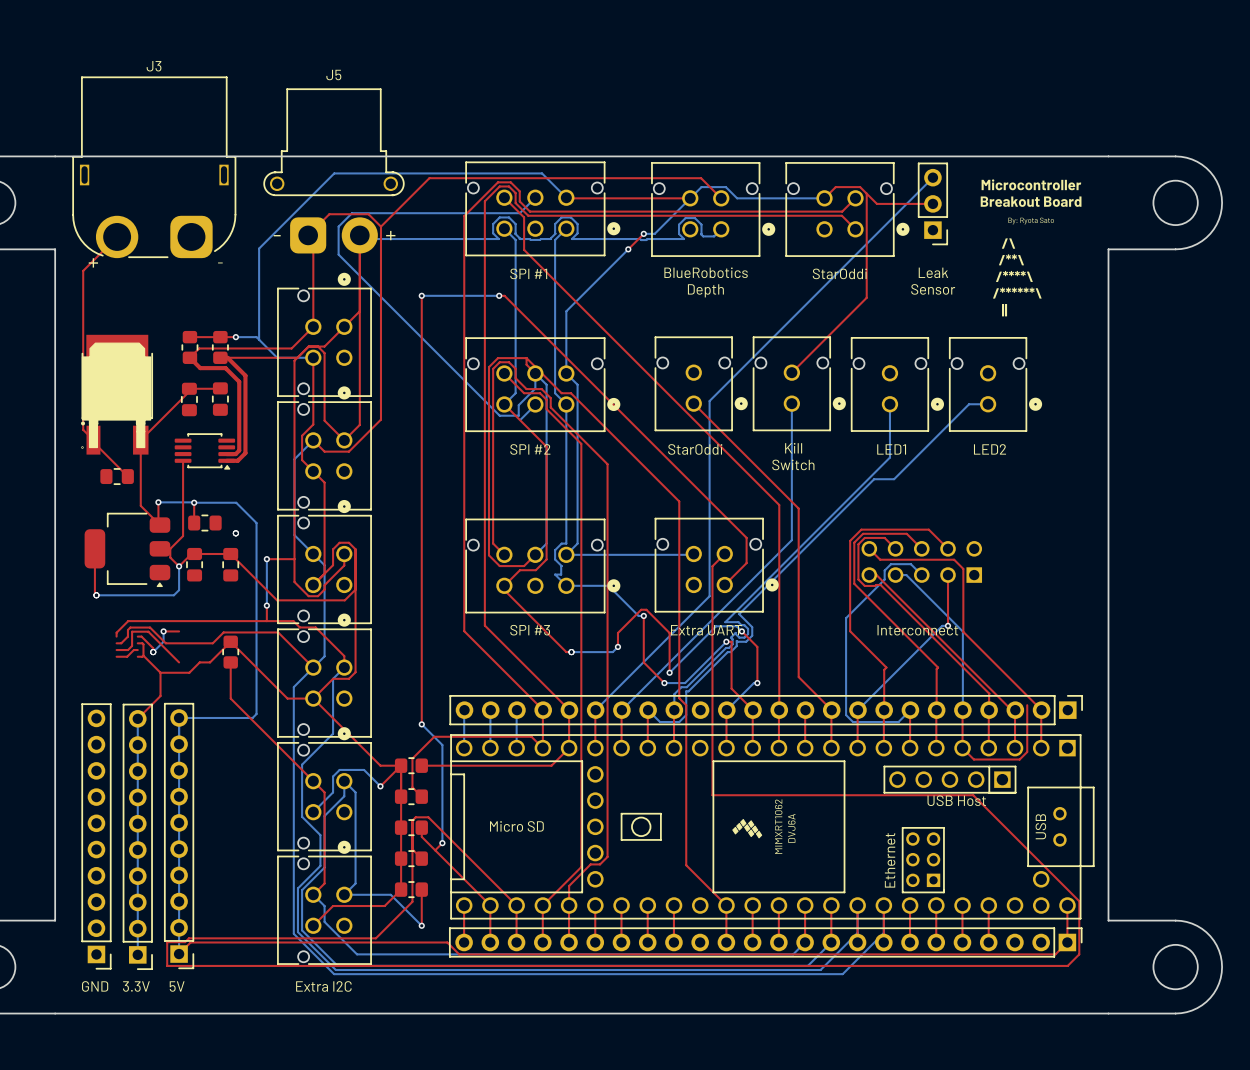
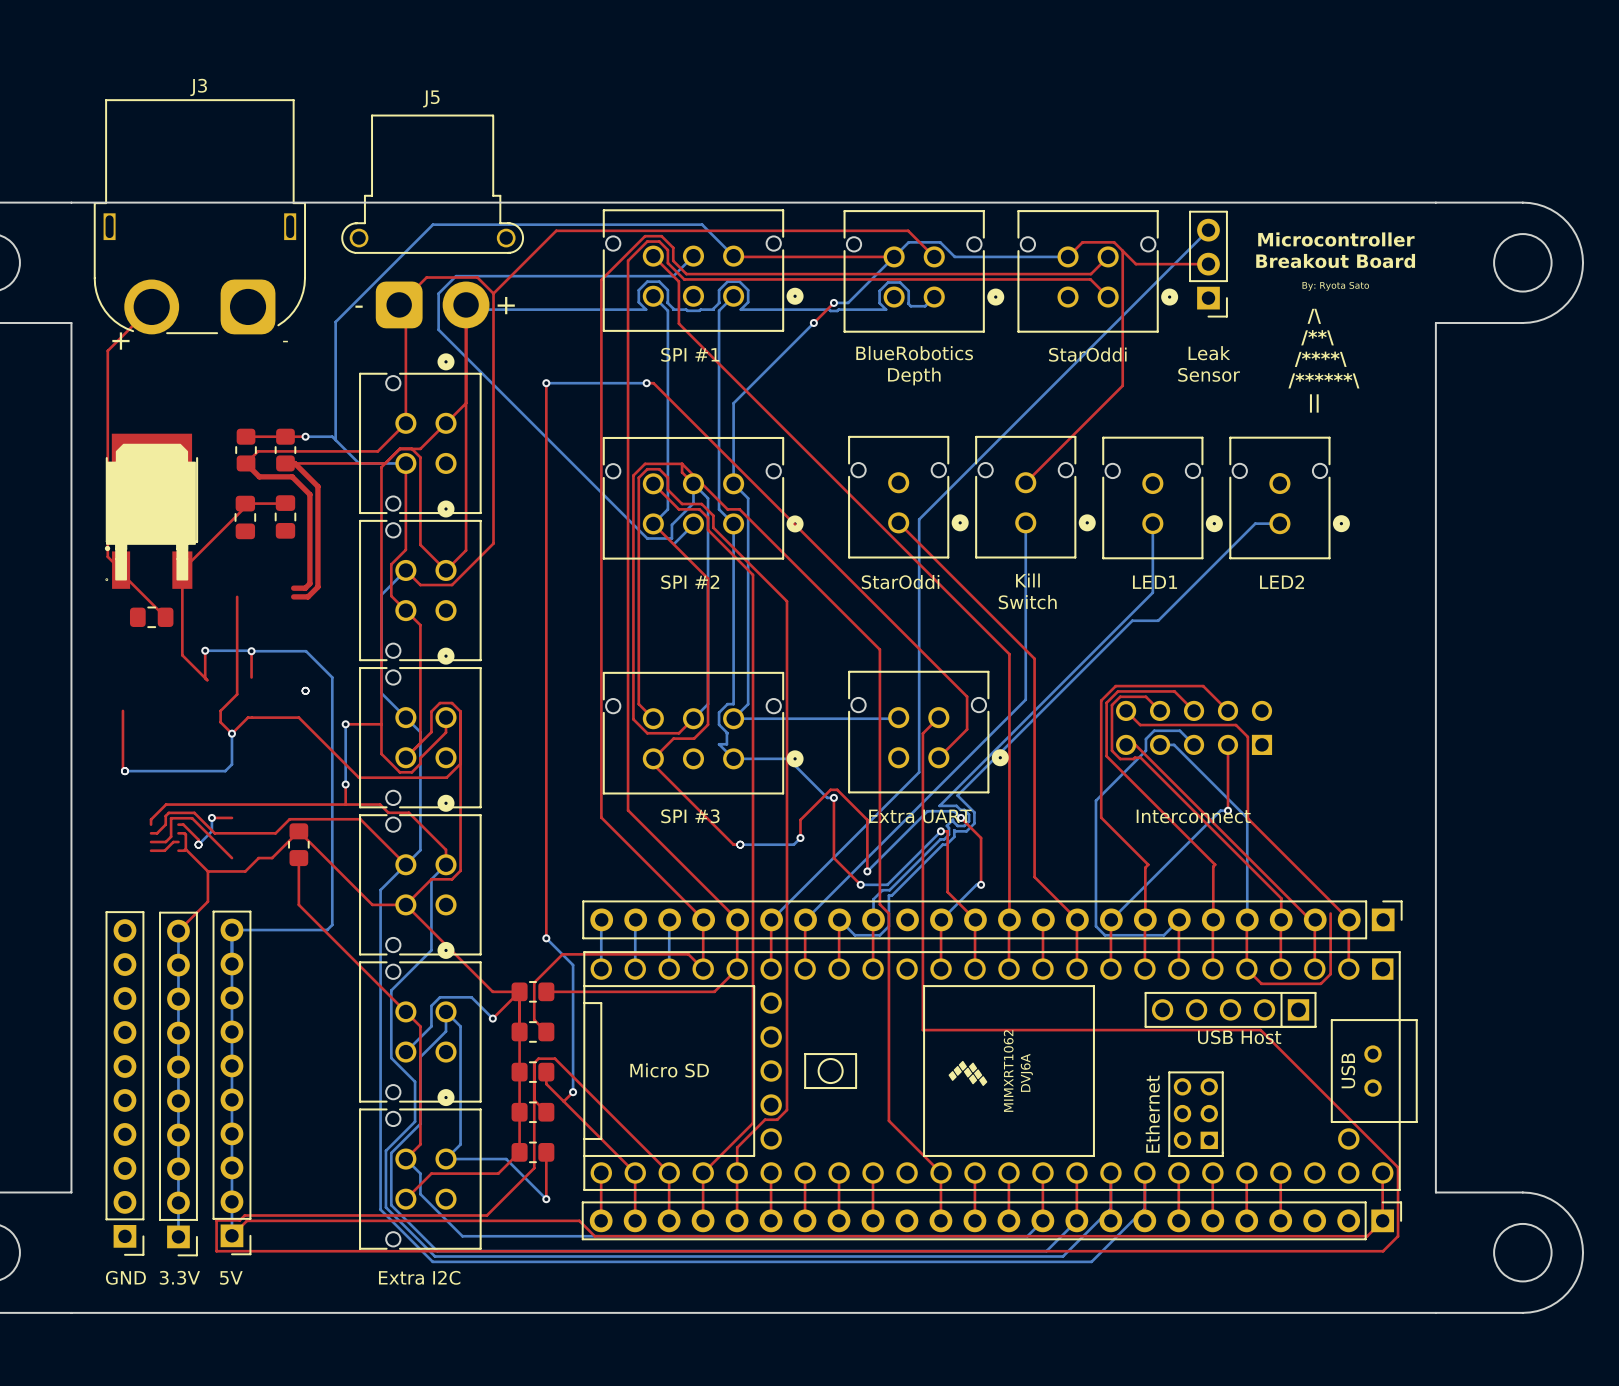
part: (204, 451) -> none
part: (204, 523) -> none
part: (127, 550) -> none
part: (194, 564) -> none
part: (230, 564) -> none

